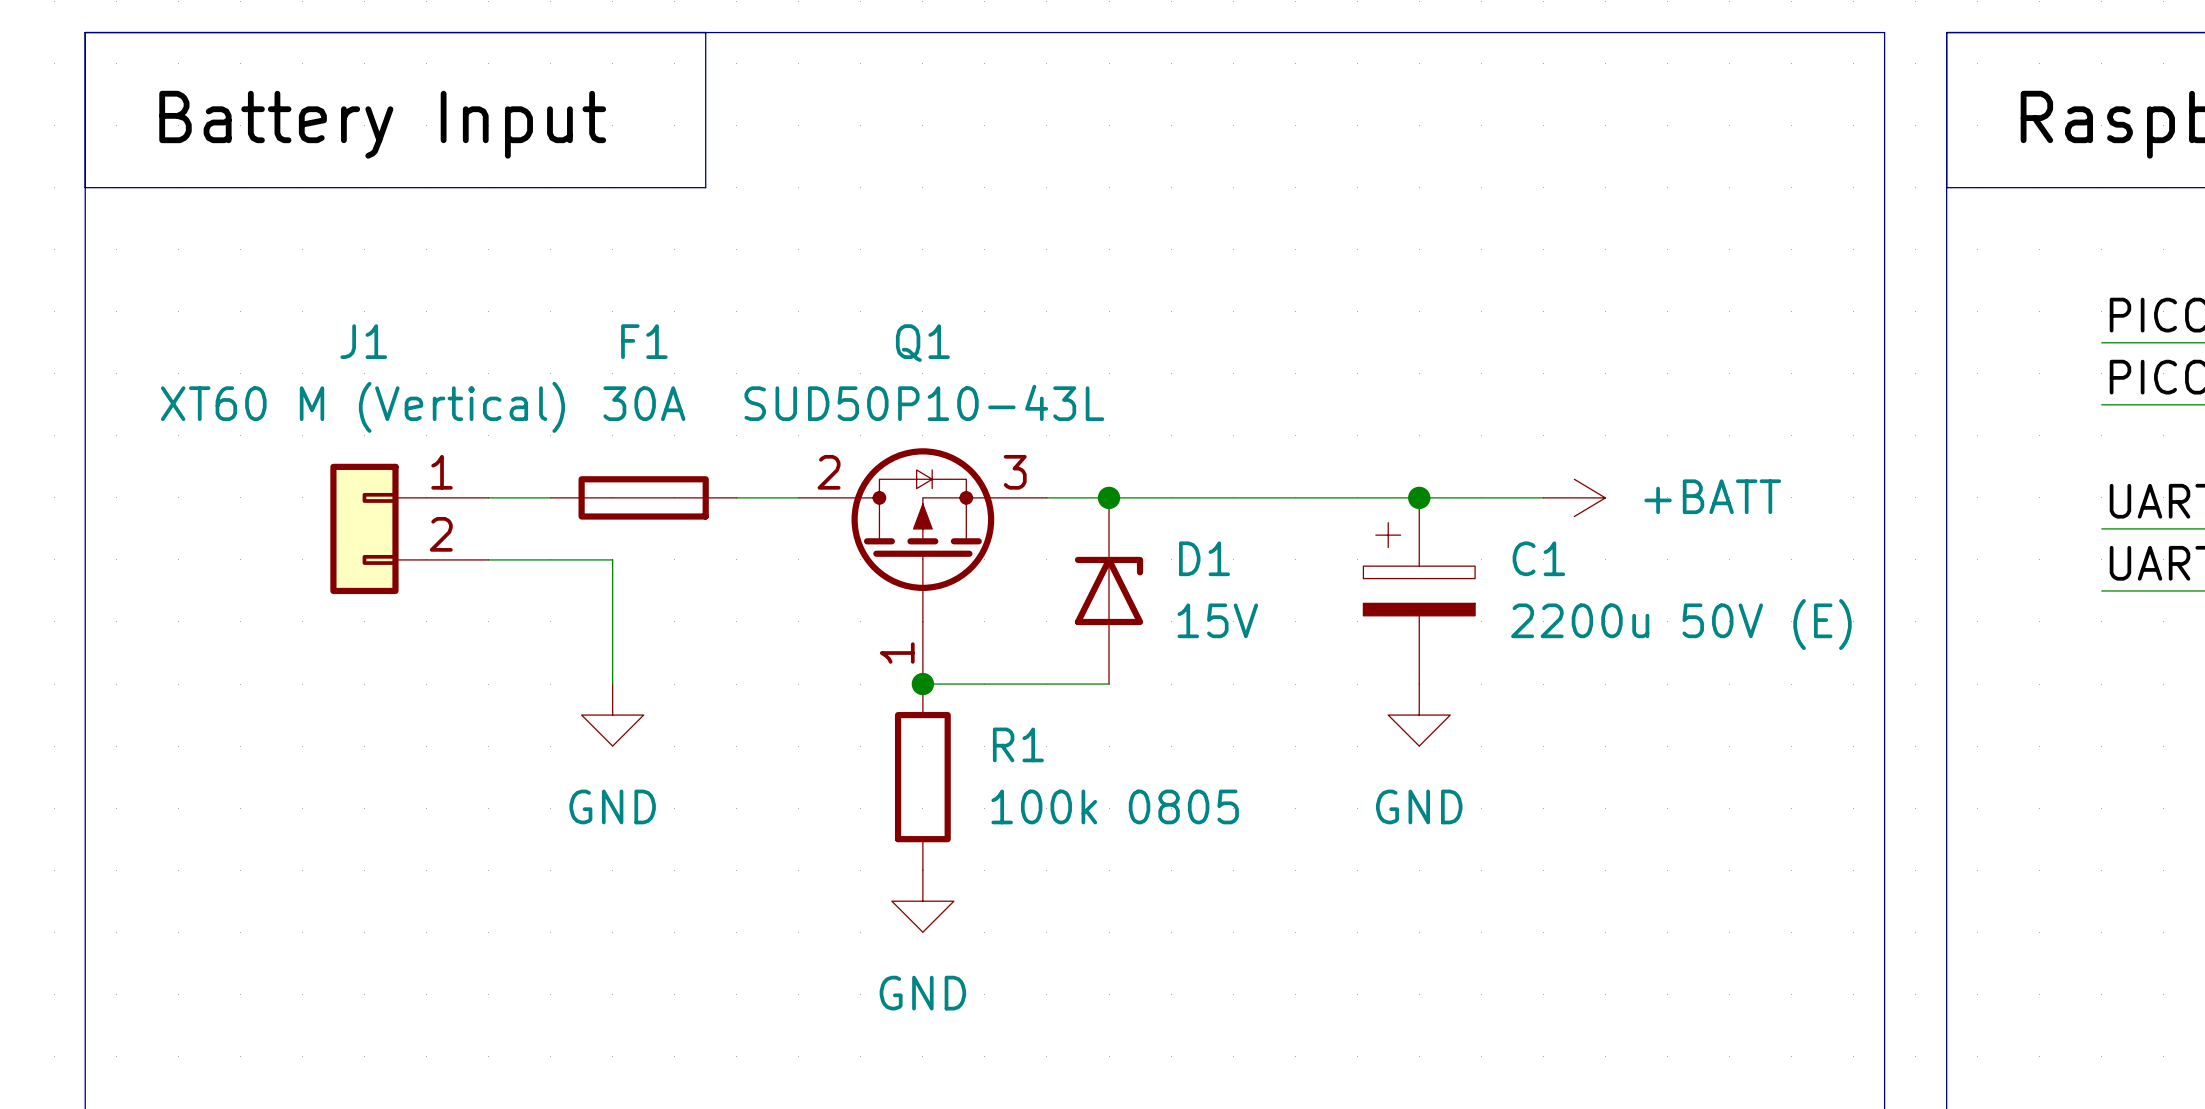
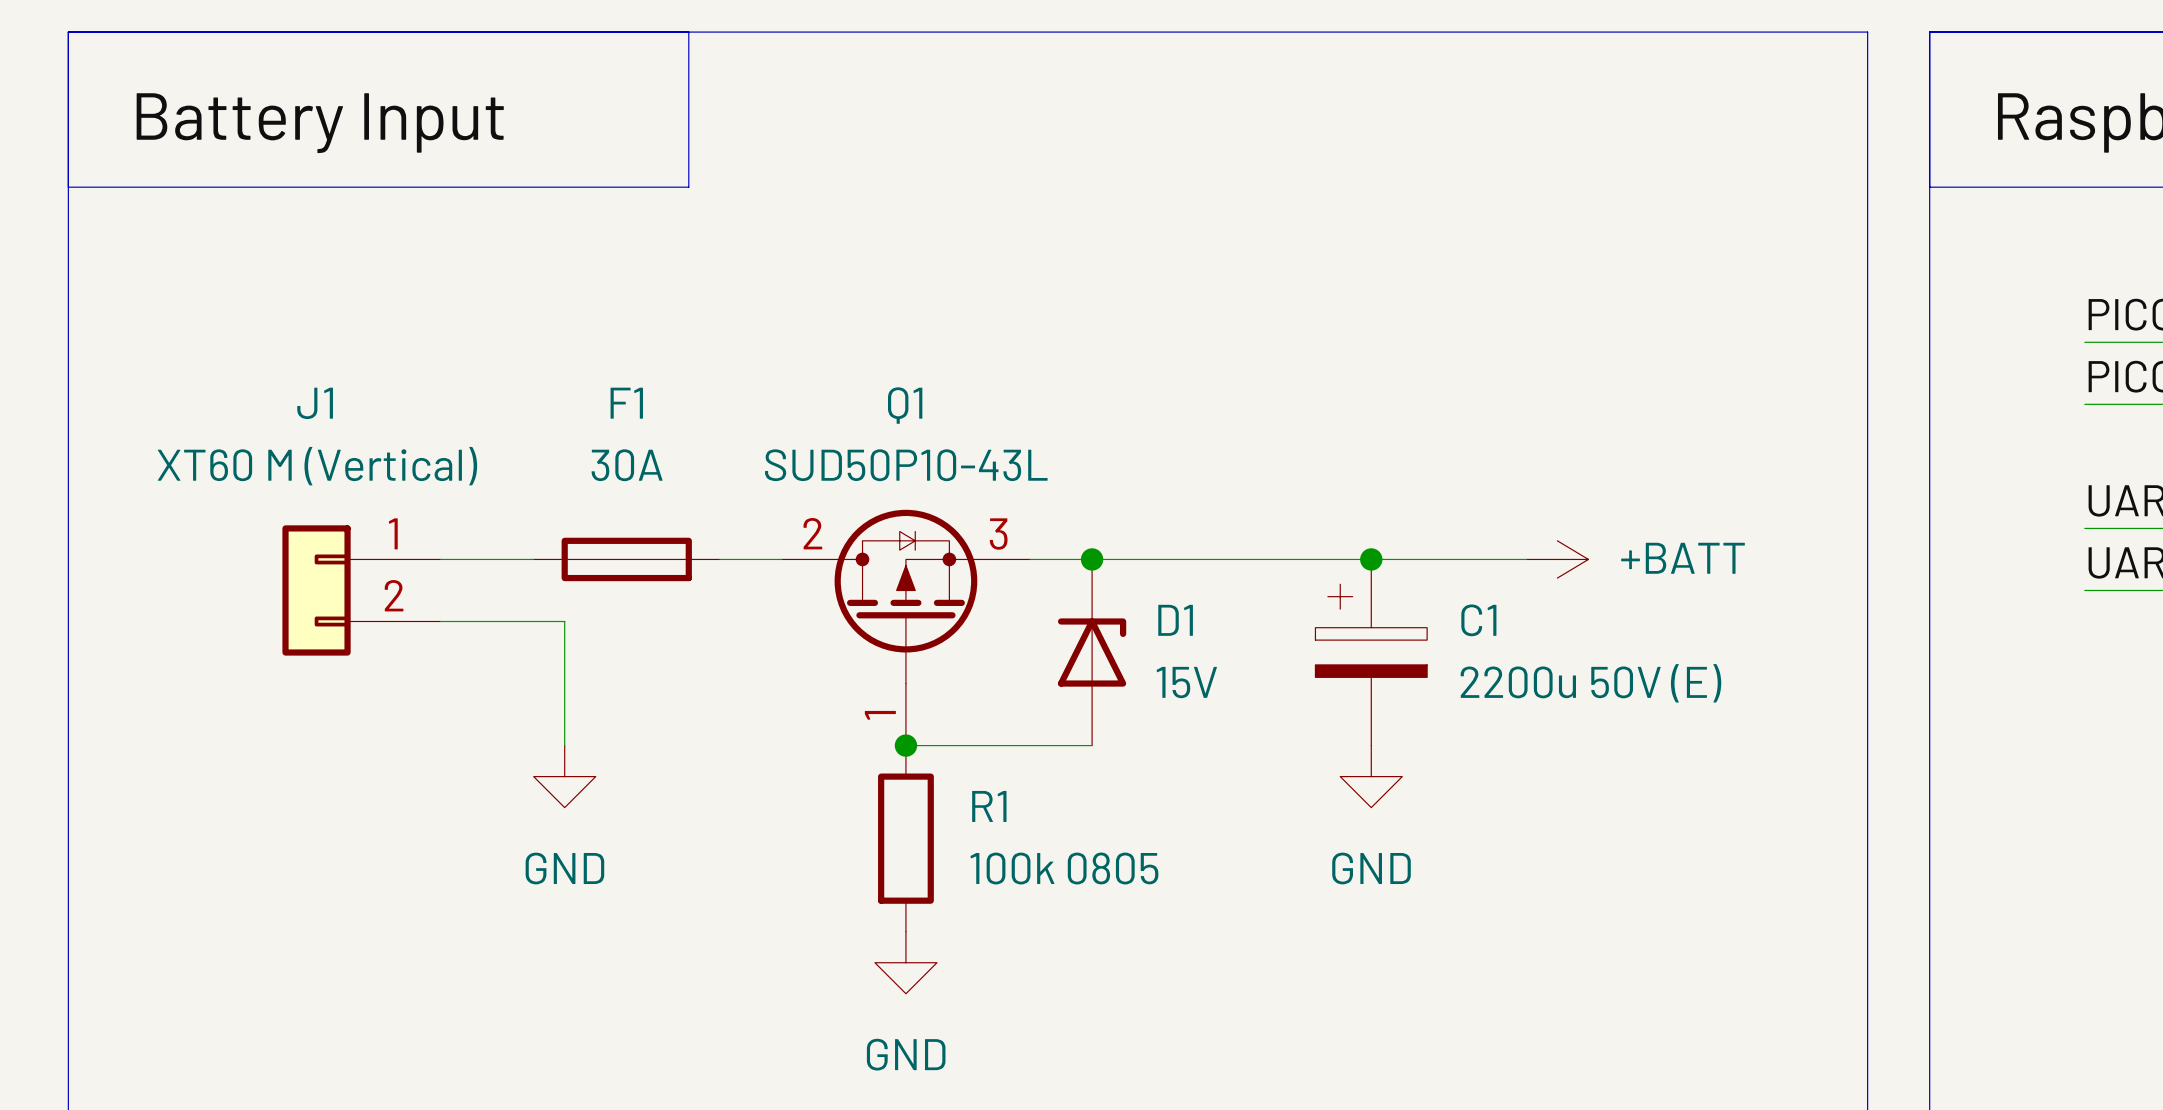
wire: (488, 497) (550, 497) -> none
F1 position: (643, 497) -> (626, 559)
wire: (736, 497) (798, 497) -> (719, 559) (781, 559)
wire: (1046, 497) (1543, 497) -> (1030, 559) (1526, 559)
junction position: (1109, 497) -> (1092, 559)
junction position: (1419, 497) -> (1371, 559)
power symbol position: +BATT (1574, 497) -> +BATT (1557, 559)
J1 position: (409, 528) -> (361, 590)
wire: (550, 559) (612, 559) (612, 684) -> none
Q1 position: (922, 566) -> (905, 627)
D1 position: (1109, 590) -> (1092, 652)
C1 position: (1419, 590) -> (1371, 652)
wire: none -> (440, 621) (564, 621) (564, 745)
wire: (922, 684) (1109, 684) -> (905, 745) (1092, 745)
junction position: (922, 684) -> (905, 745)
power symbol position: GND (612, 715) -> GND (564, 776)
power symbol position: GND (1419, 715) -> GND (1371, 776)
R1 position: (922, 777) -> (905, 838)
power symbol position: GND (922, 901) -> GND (905, 962)

